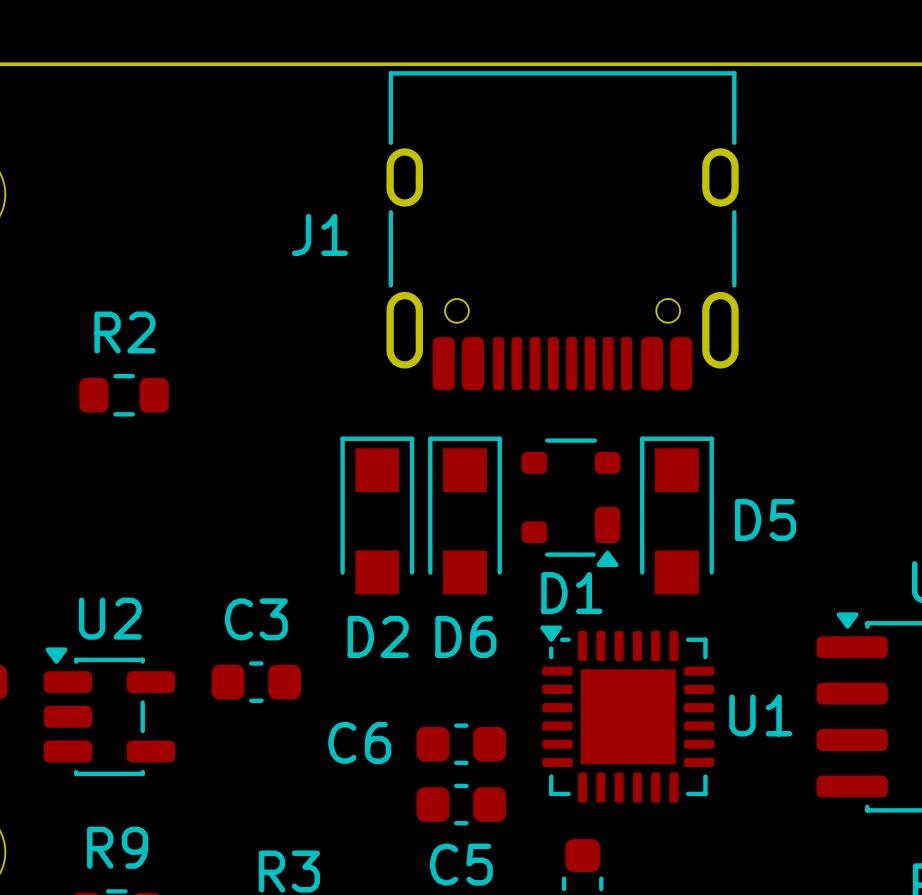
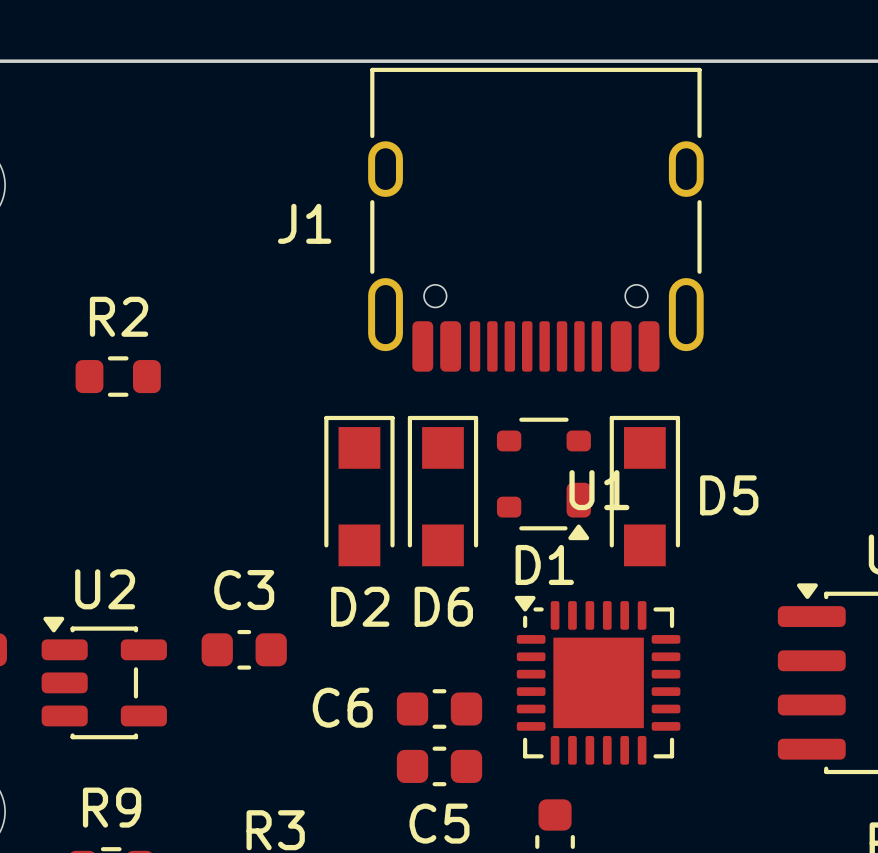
U1 name position: U1 (760, 715) -> U1 (599, 490)

